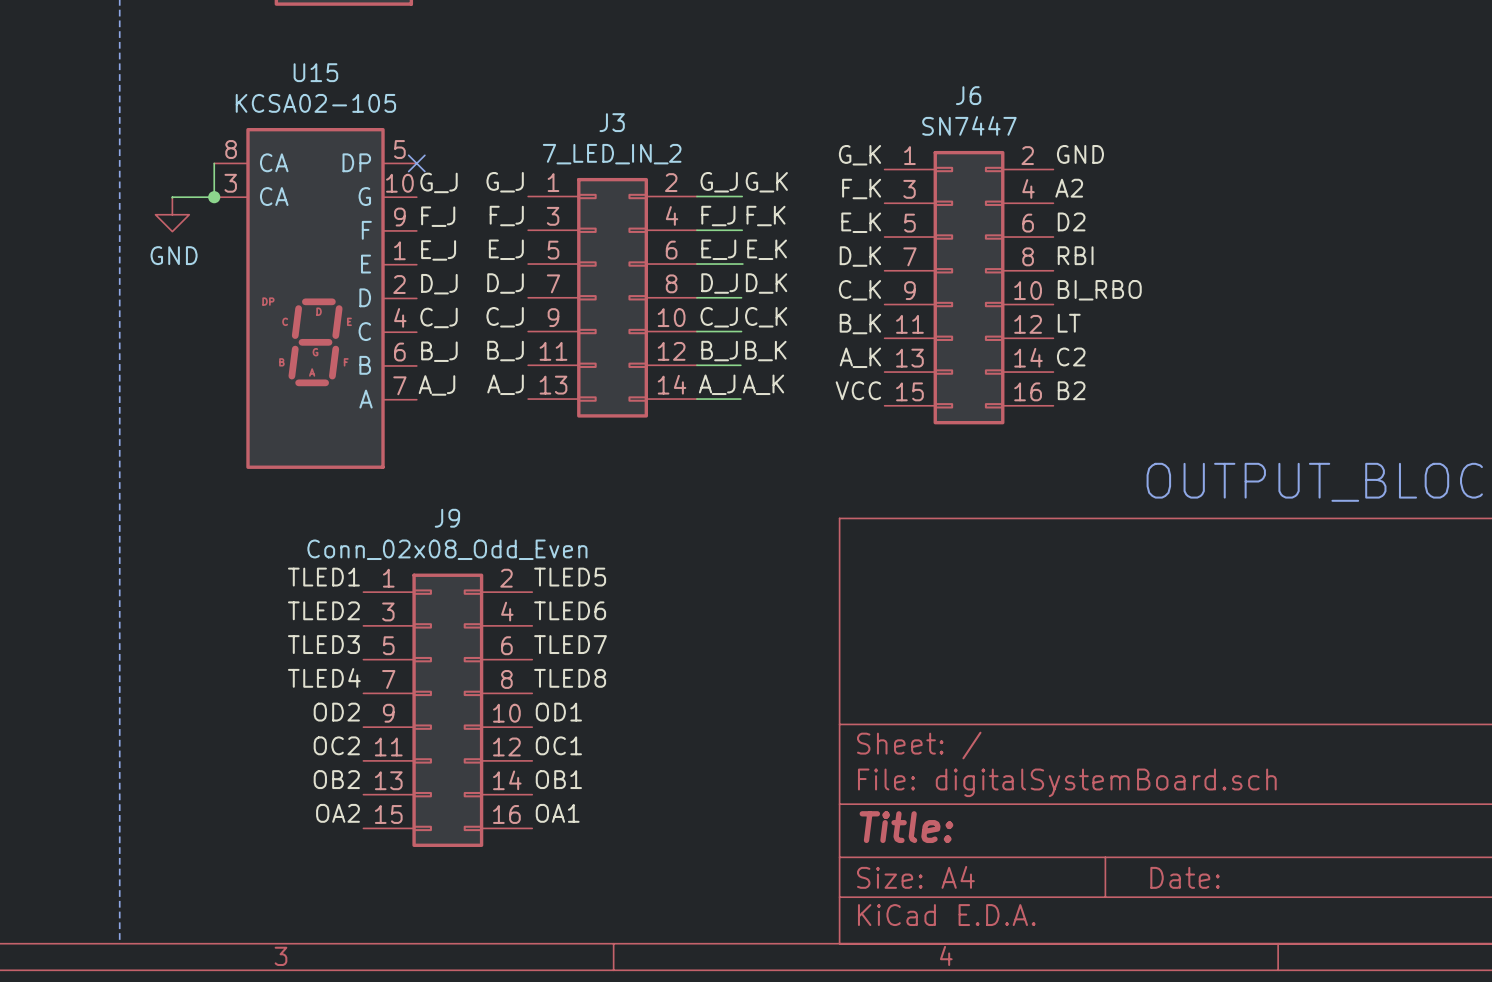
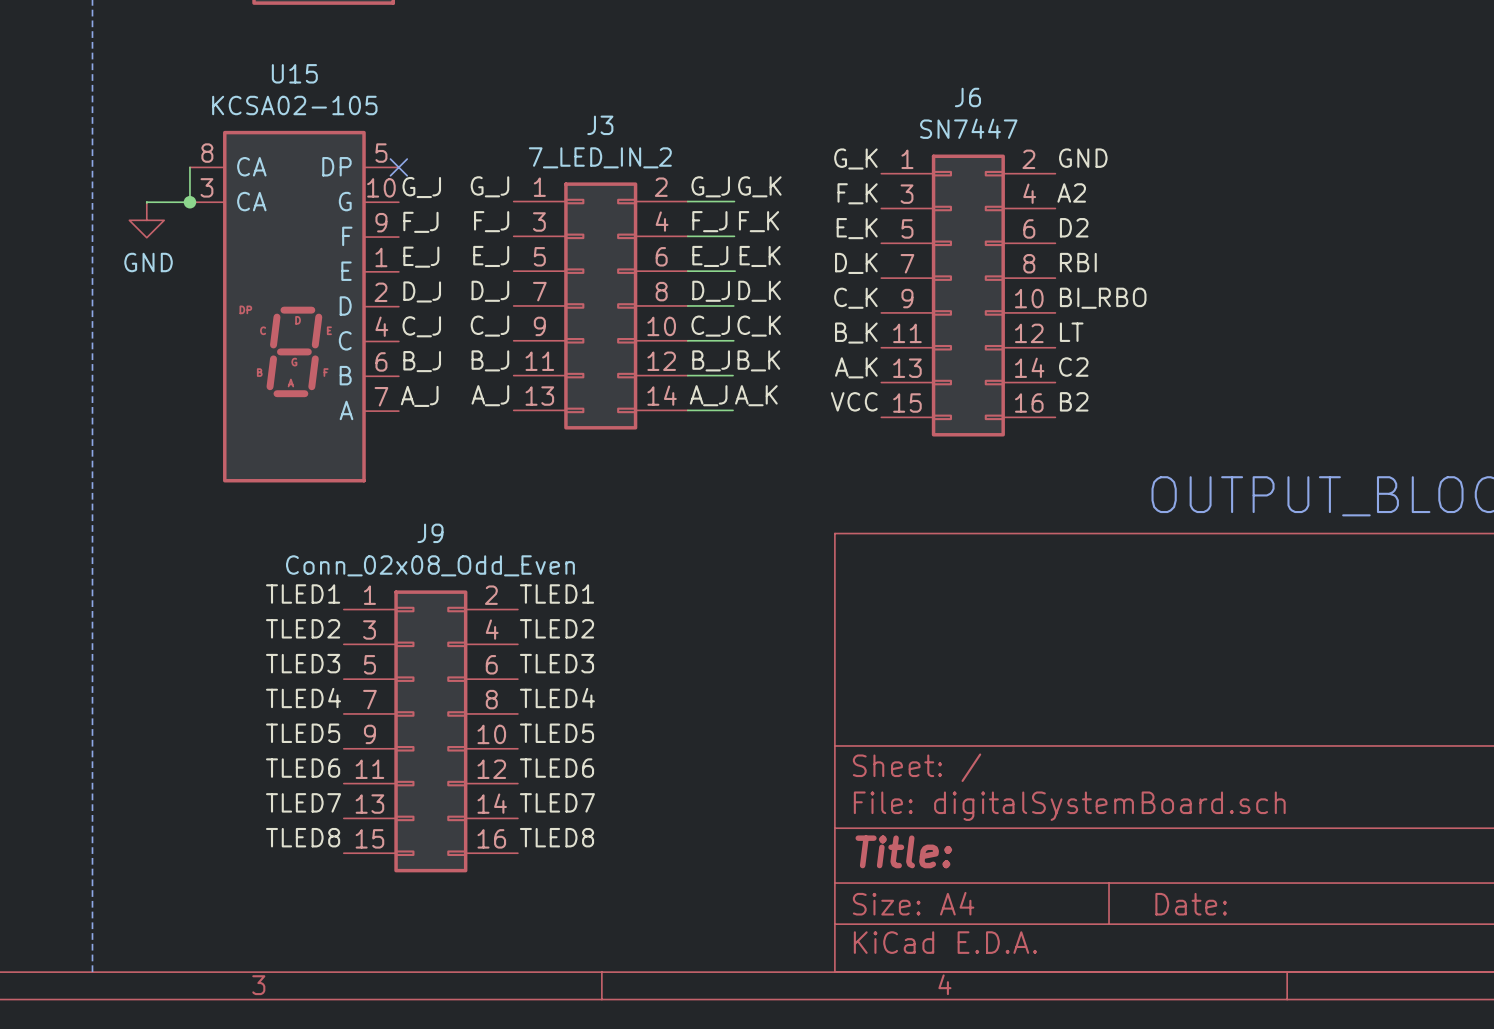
label: TLED5 (570, 577) -> TLED1 (556, 594)
label: TLED6 (570, 610) -> TLED2 (556, 628)
label: TLED7 (570, 644) -> TLED3 (556, 663)
label: TLED8 (570, 678) -> TLED4 (557, 698)
label: OD2 (336, 712) -> TLED5 (303, 733)
label: OD1 (558, 712) -> TLED5 (556, 733)
label: OC2 (336, 745) -> TLED6 (303, 768)
label: OC1 (558, 745) -> TLED6 (556, 768)
label: OB2 (336, 779) -> TLED7 (303, 802)
label: OB1 (558, 779) -> TLED7 (557, 802)
label: OA2 (337, 813) -> TLED8 (303, 837)
label: OA1 (557, 813) -> TLED8 (556, 837)

